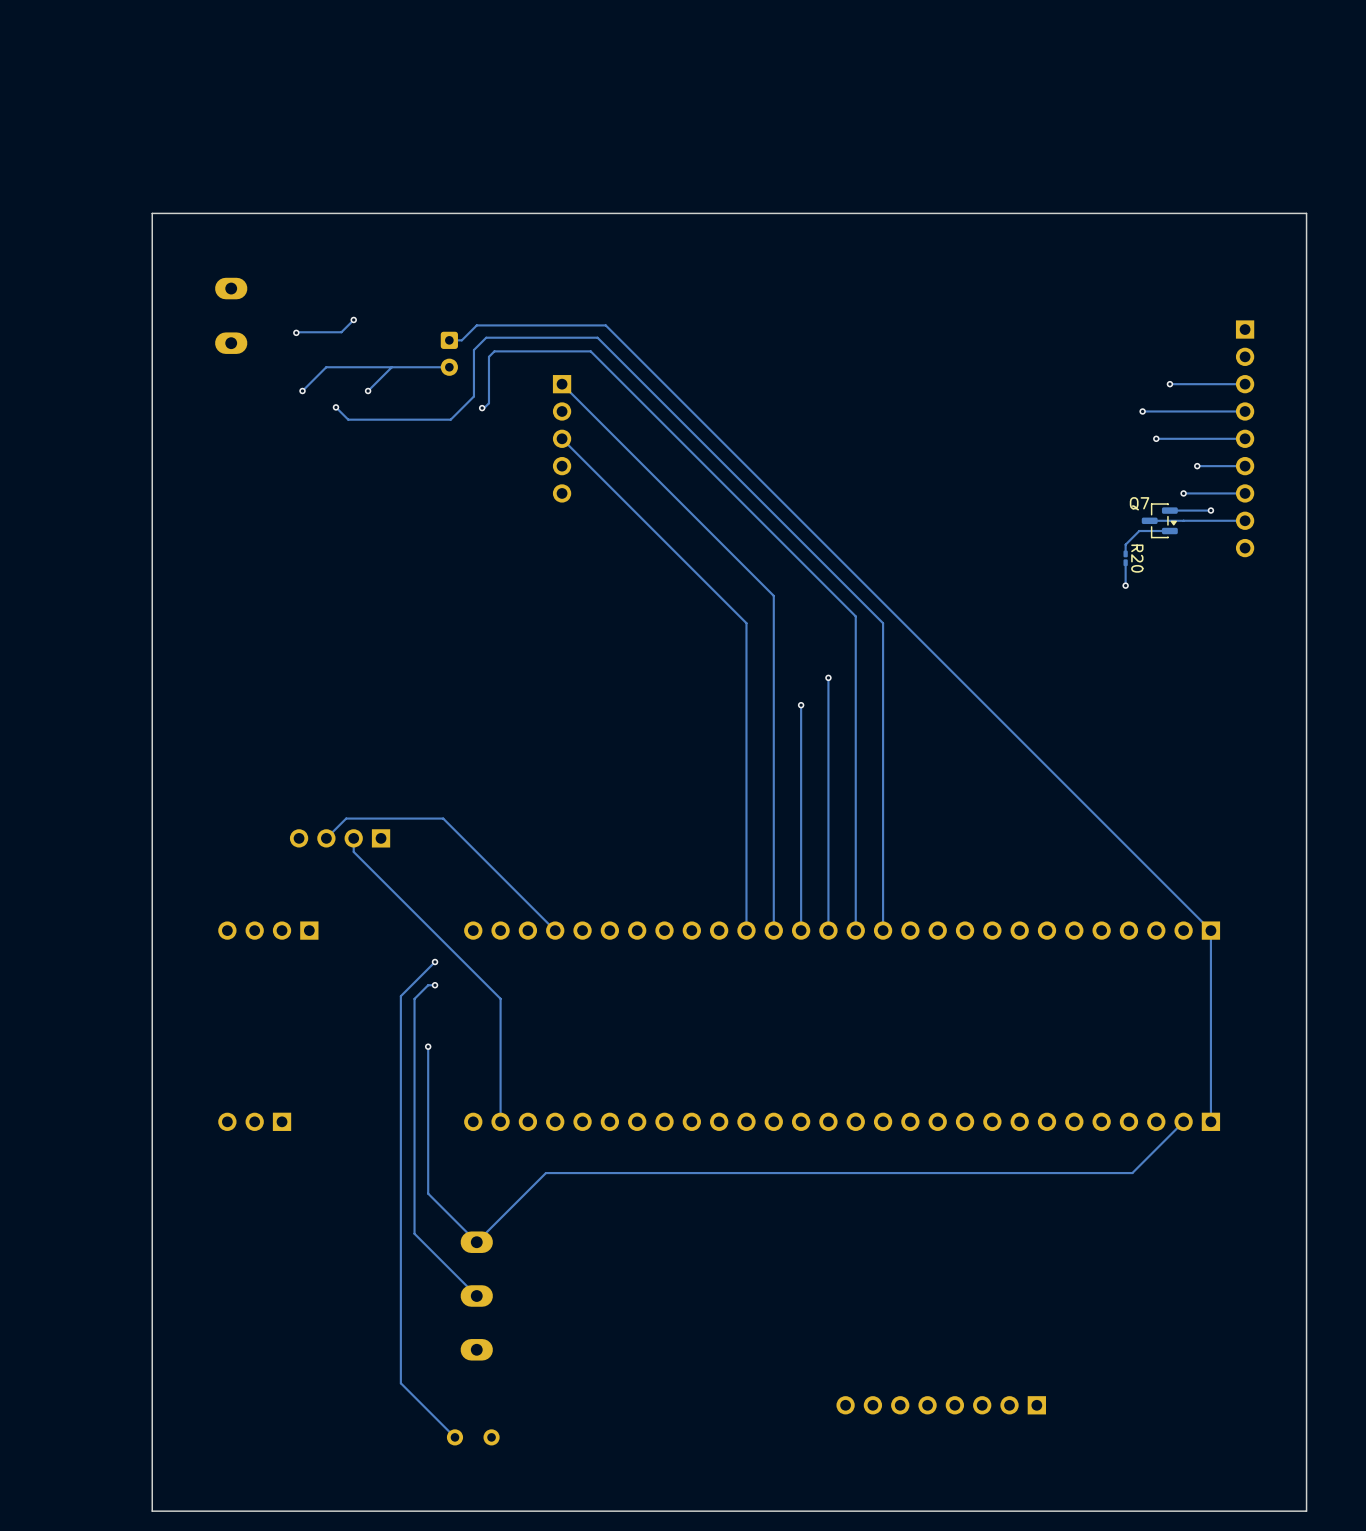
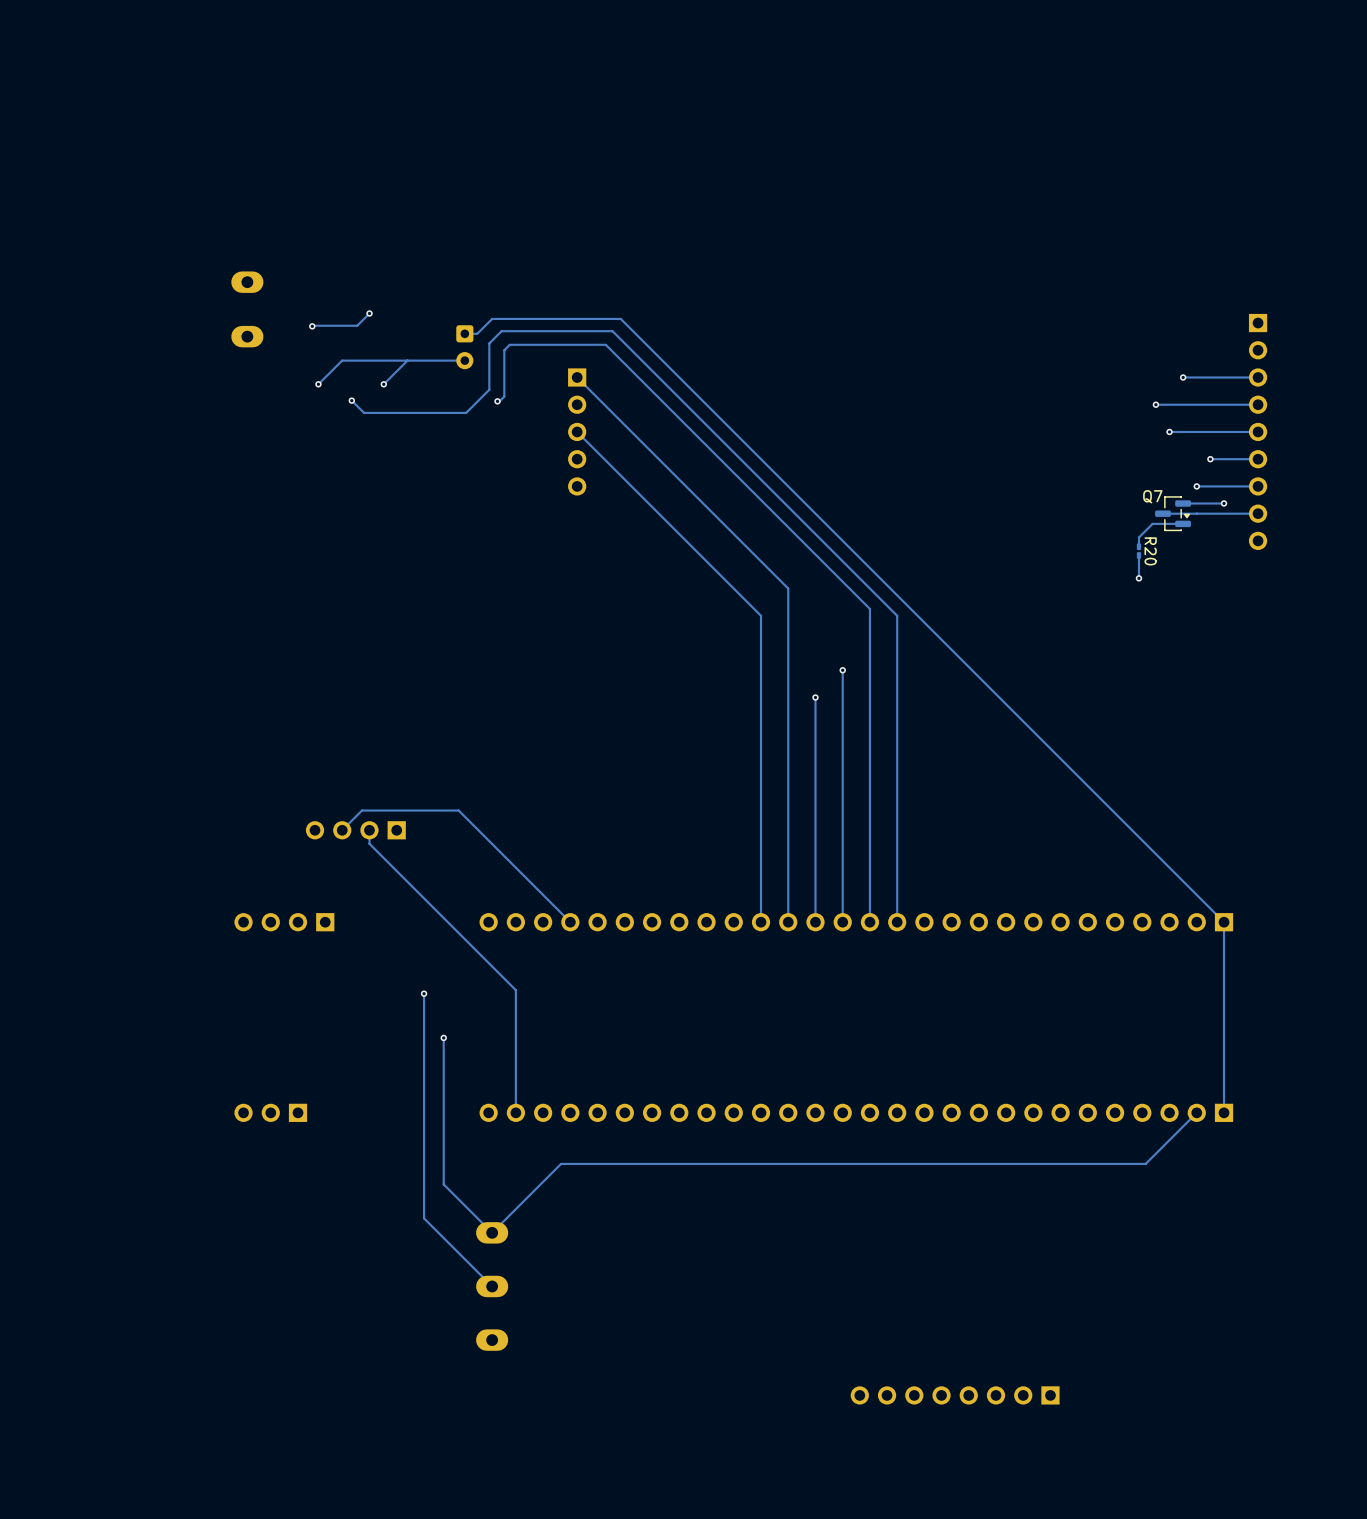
board edge: (1306, 213) (152, 213) (152, 1511) (1306, 1511) (1306, 213) -> none
track: (435, 962) (400, 996) (400, 1383) (454, 1437) -> none
via: (435, 962) -> none
track: (435, 985) (428, 985) (414, 998) (414, 1233) -> (424, 993) (424, 1218) (430, 1224)
via: (435, 985) -> none
via: none -> (424, 993)
part: (473, 1437) -> none

